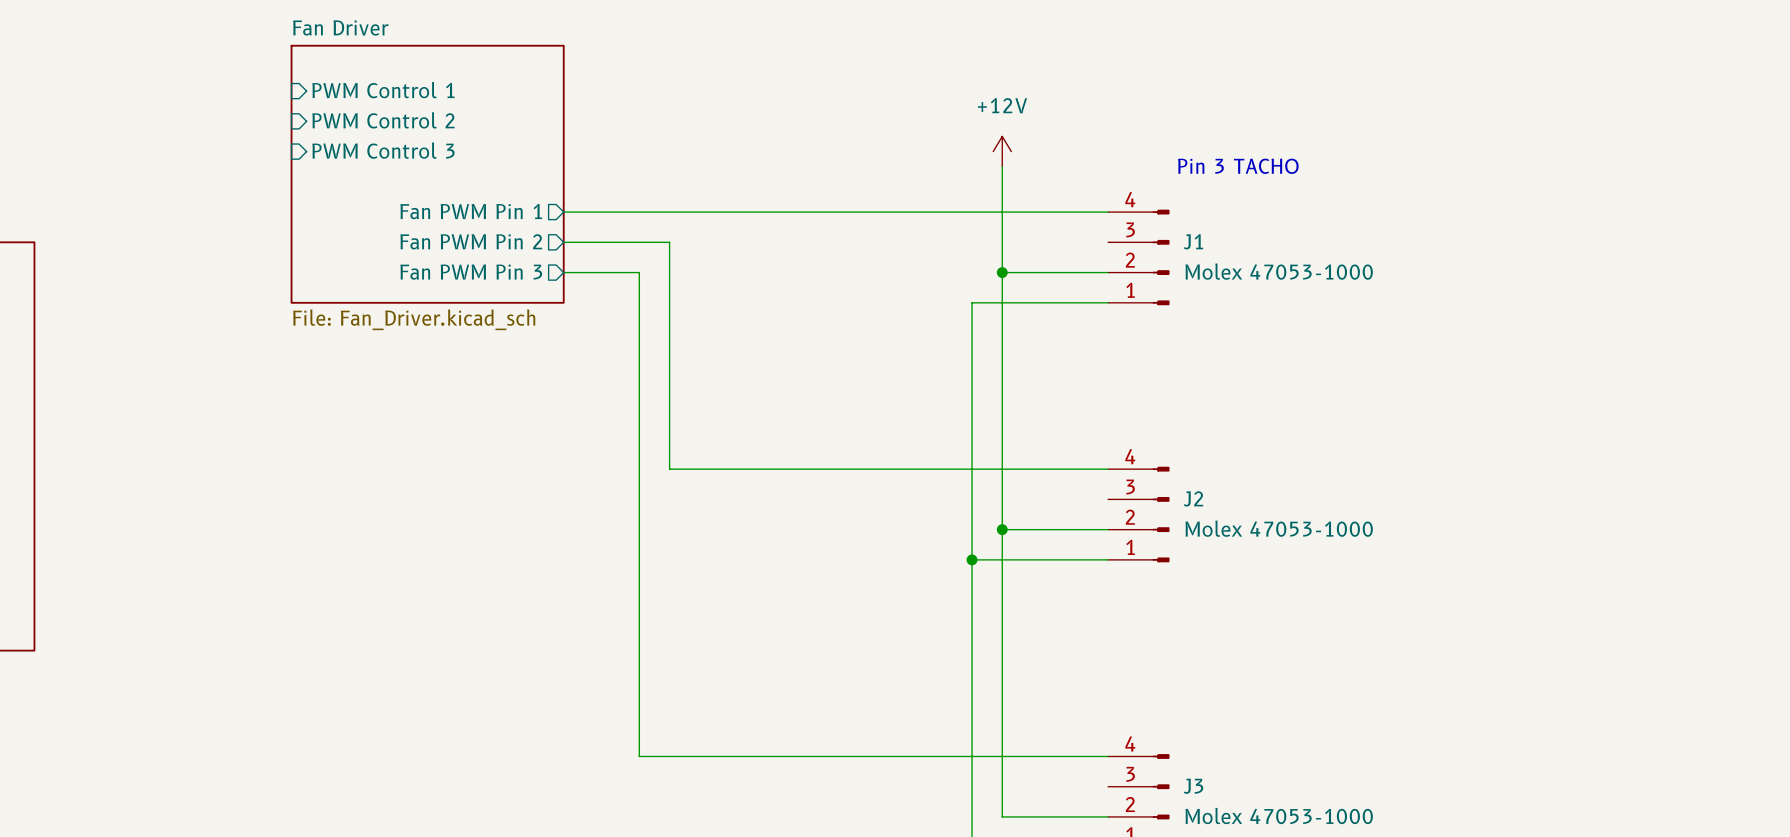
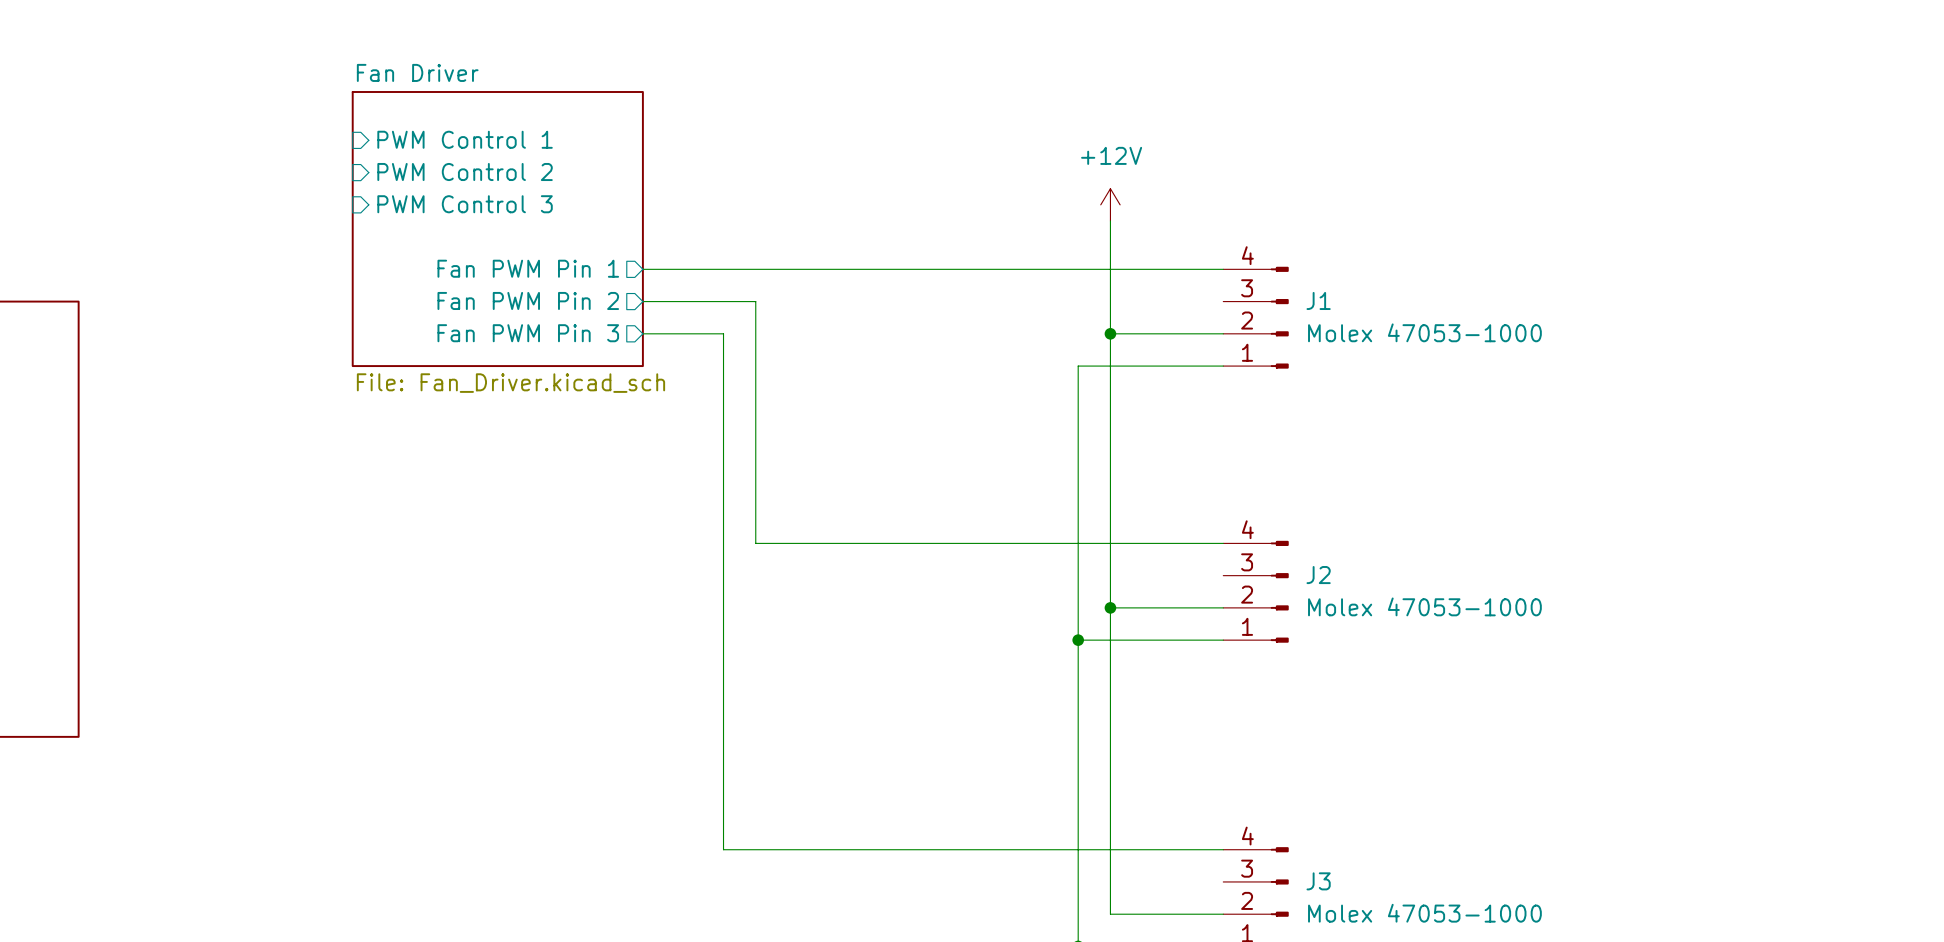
text: Pin 3 TACHO (1238, 166) -> none

